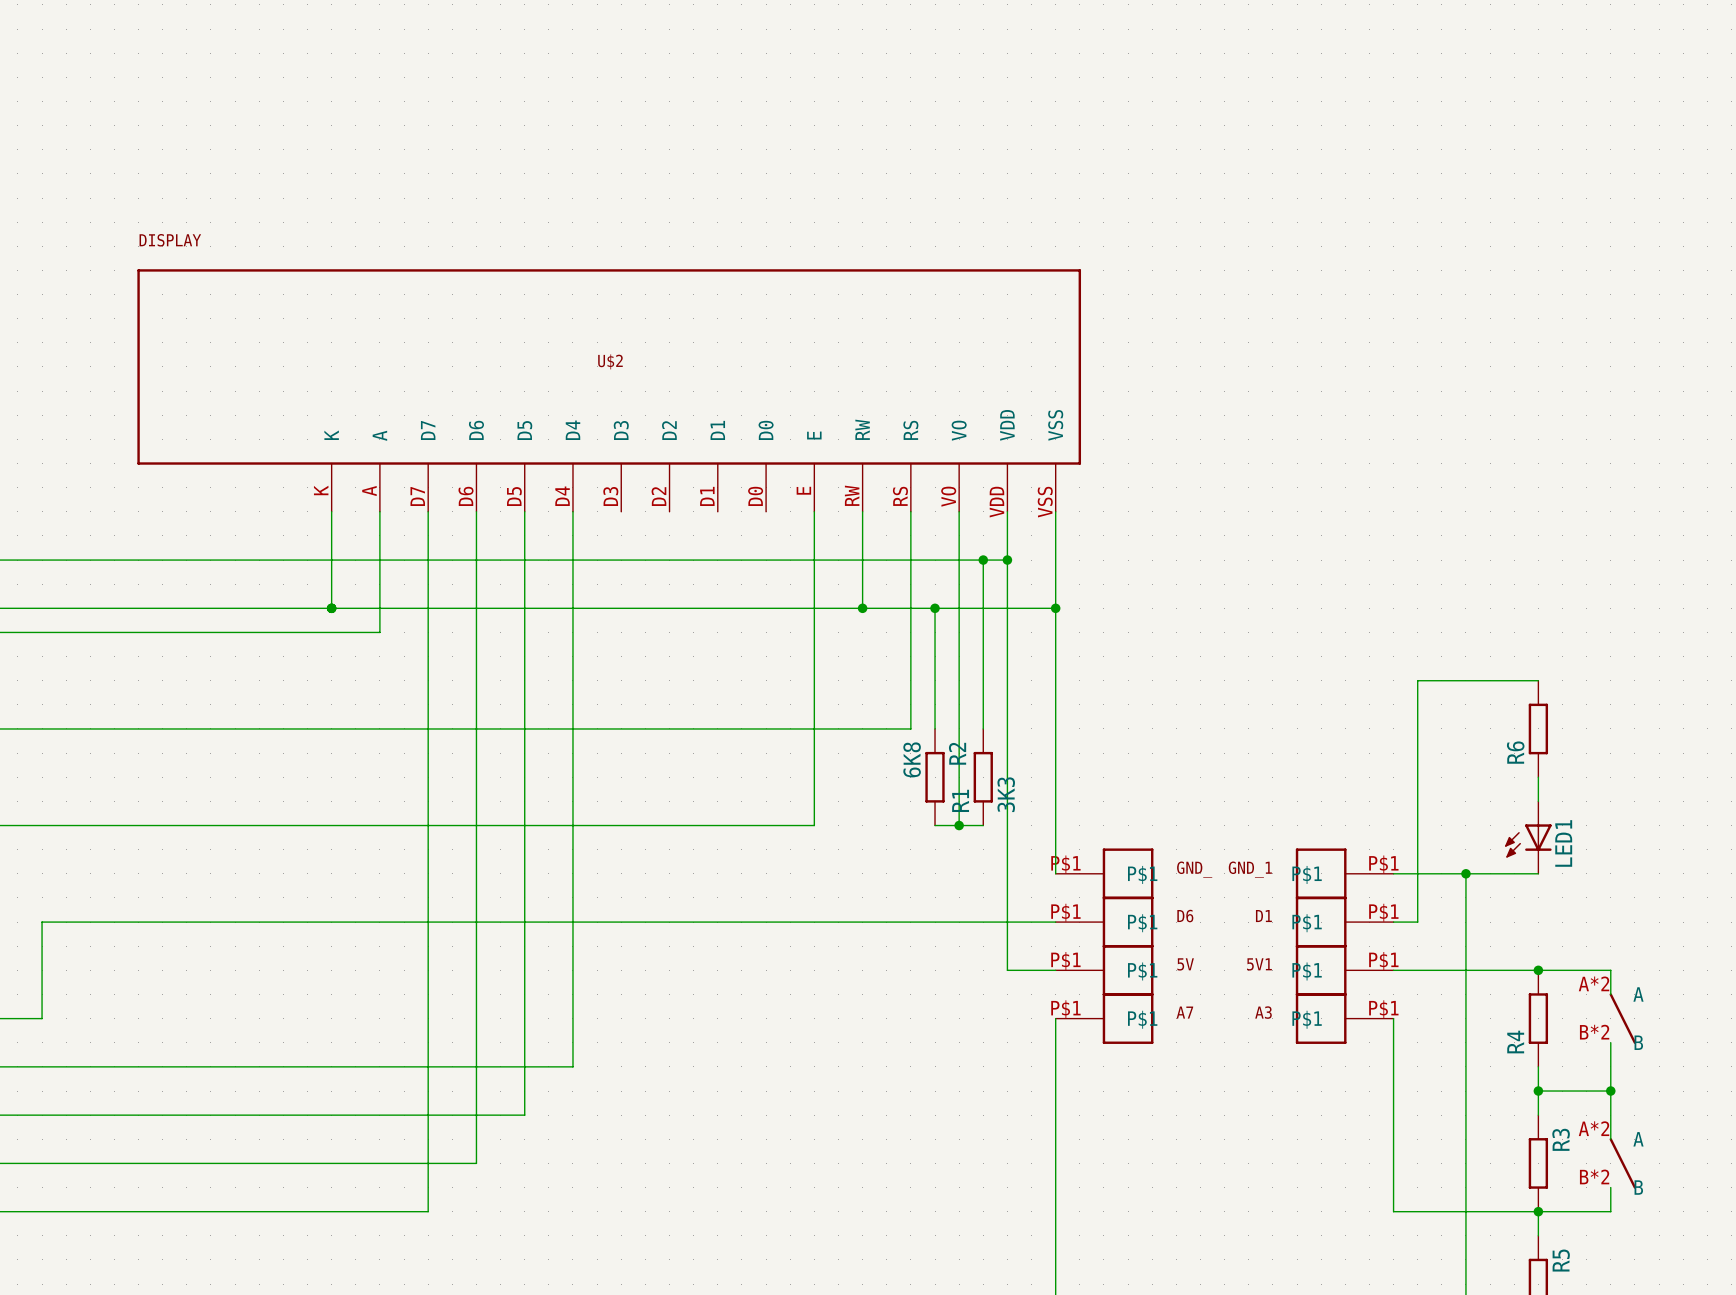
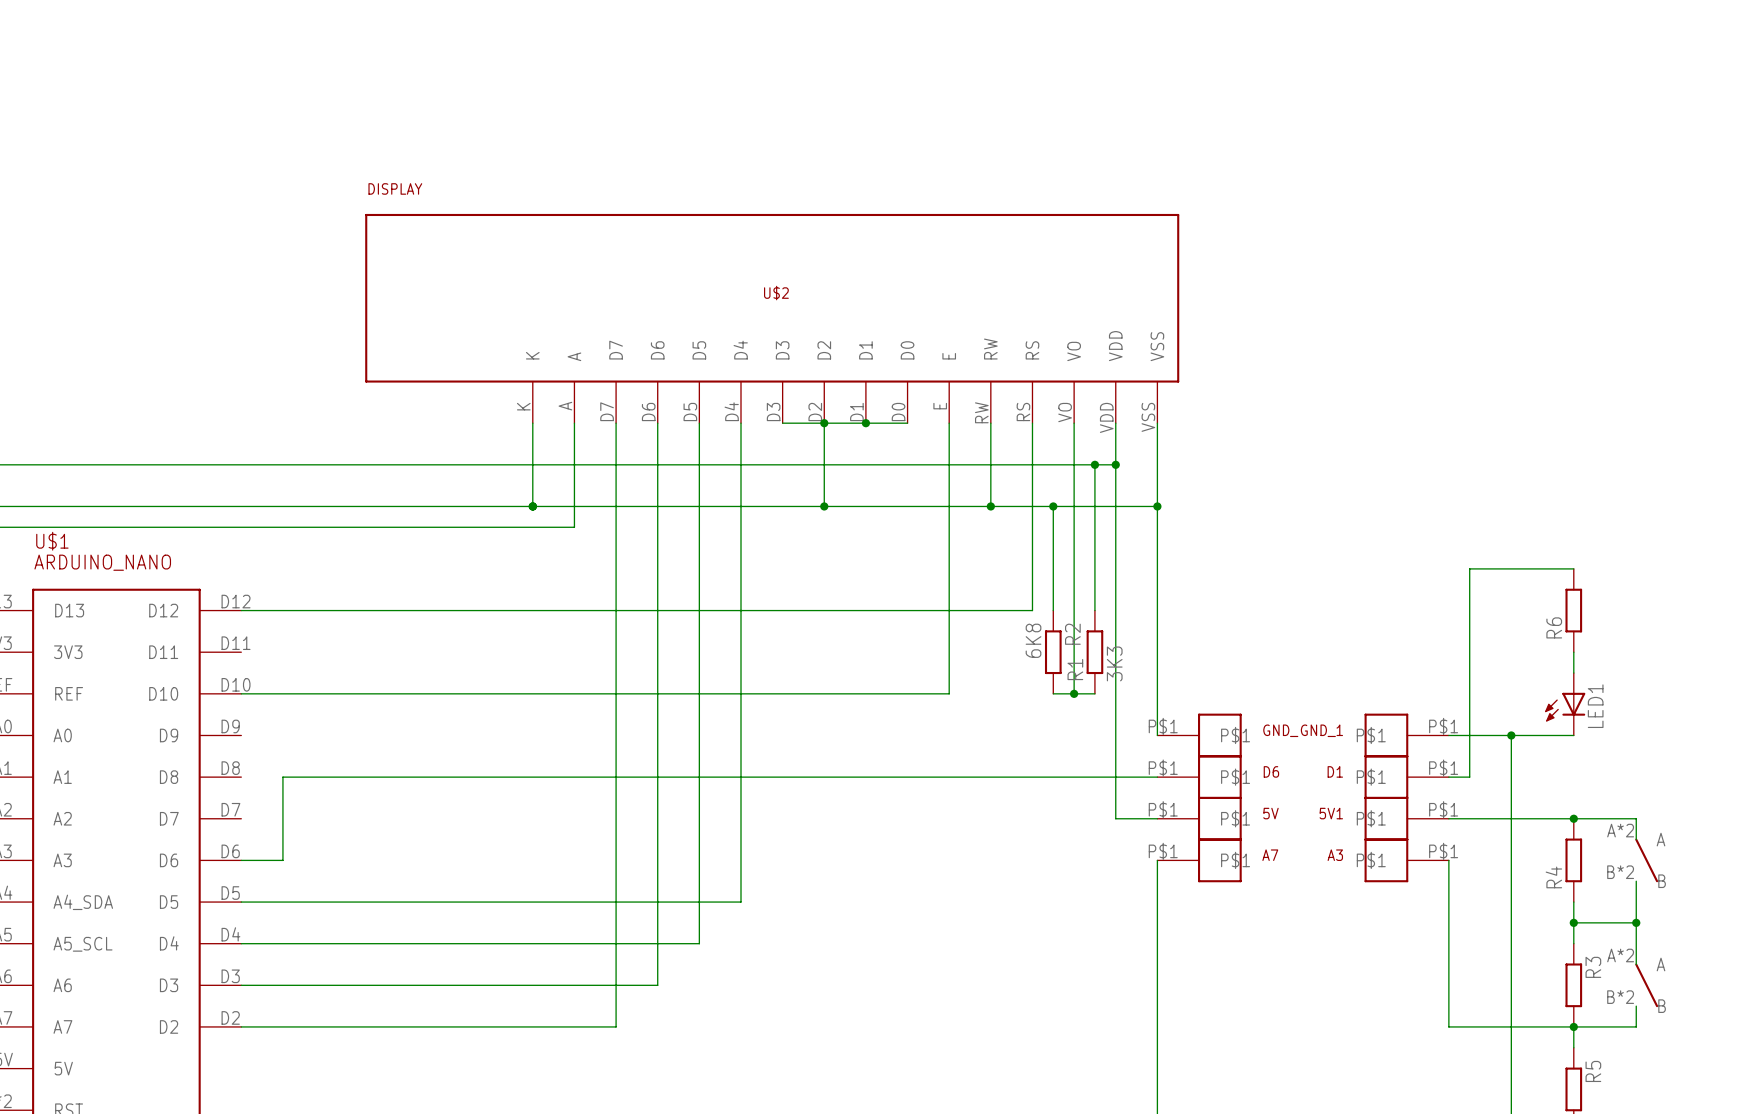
wire: none -> (782, 423) (907, 423)
wire: none -> (824, 423) (824, 506)
junction: none -> (824, 423)
junction: none -> (865, 423)
junction: none -> (824, 506)

